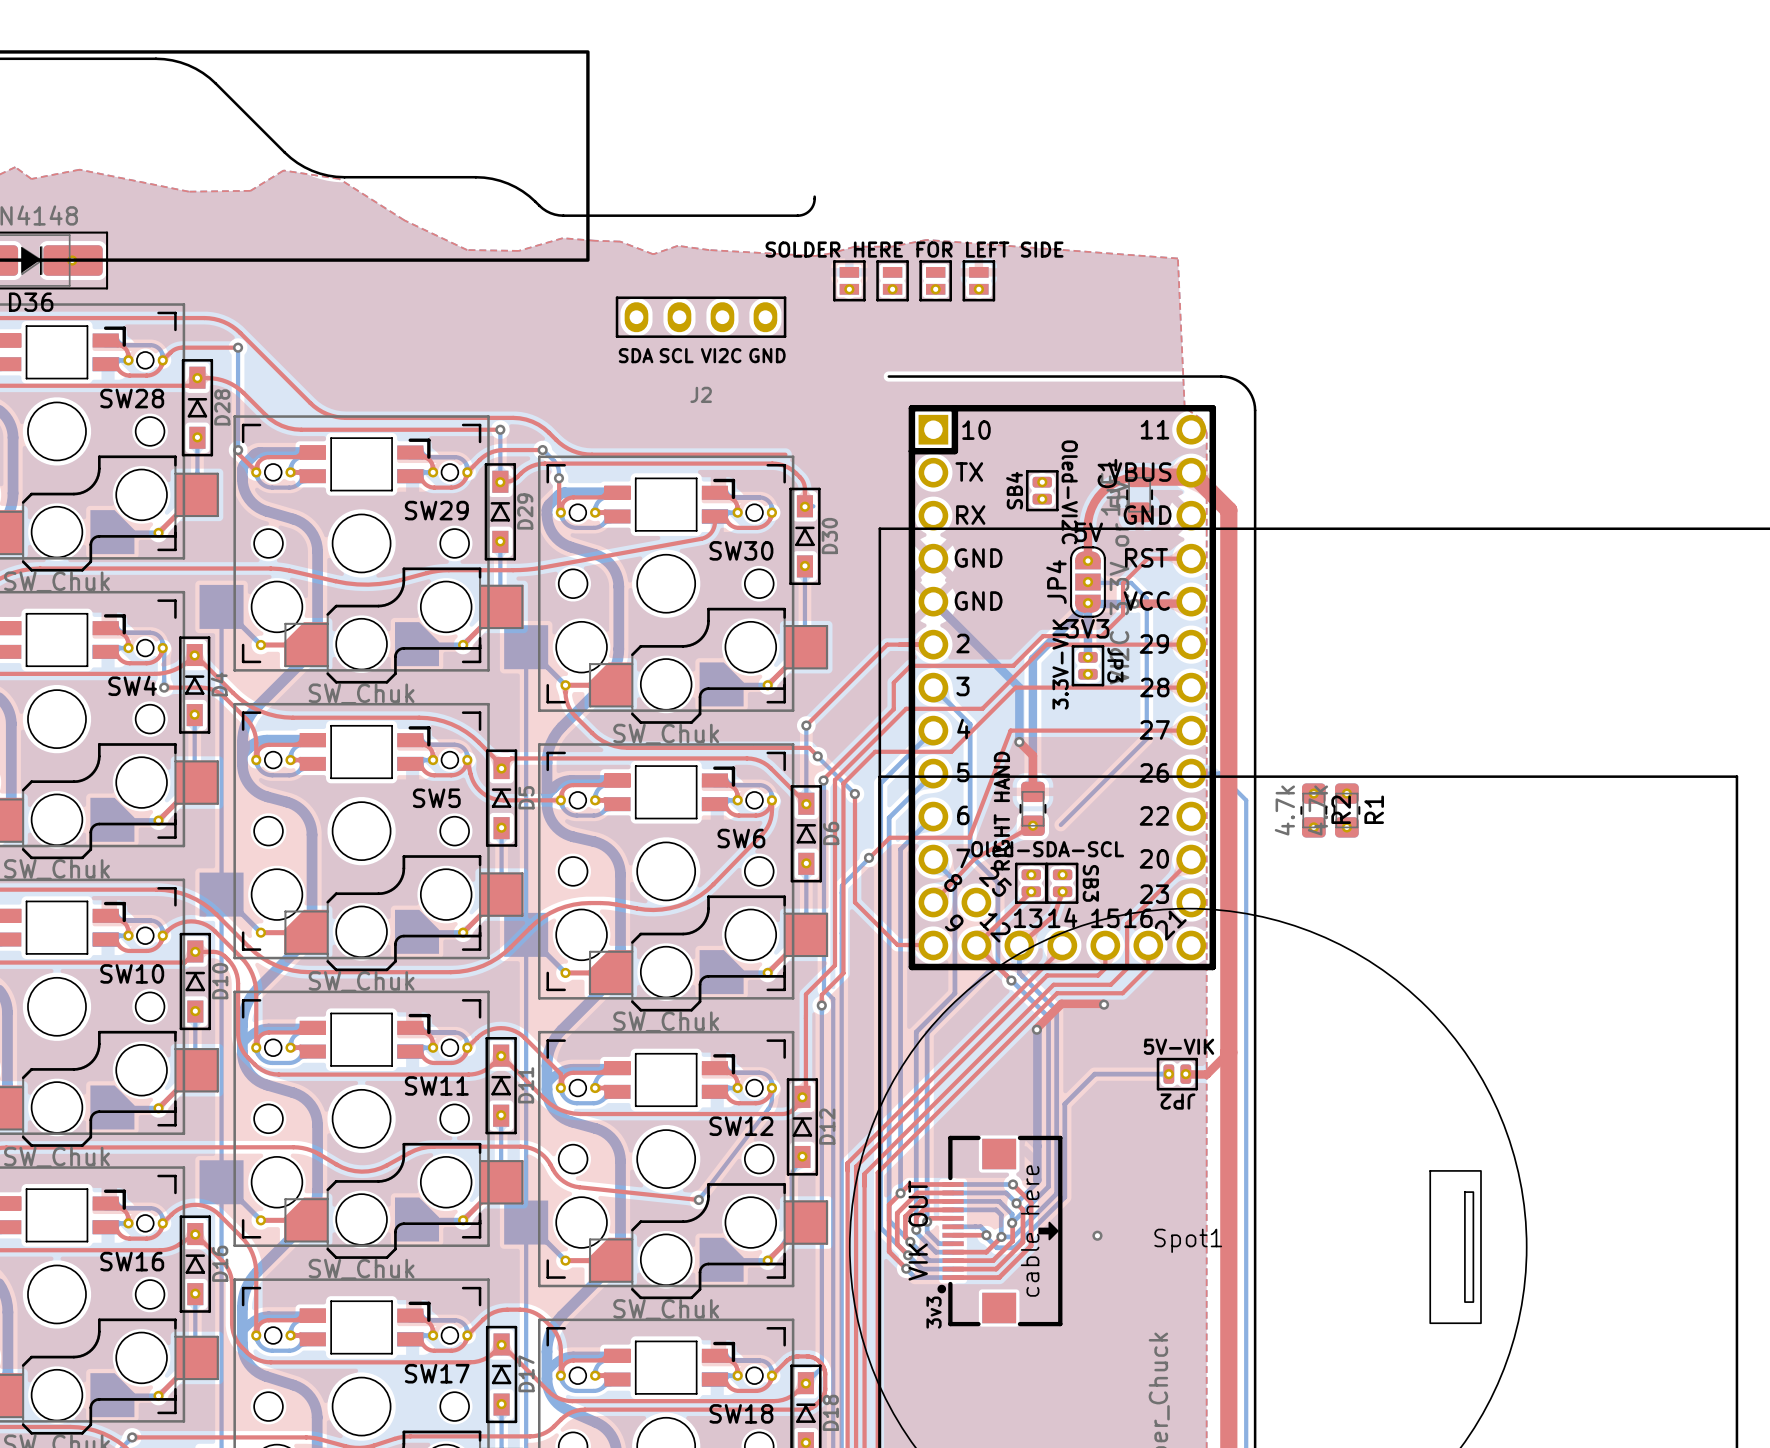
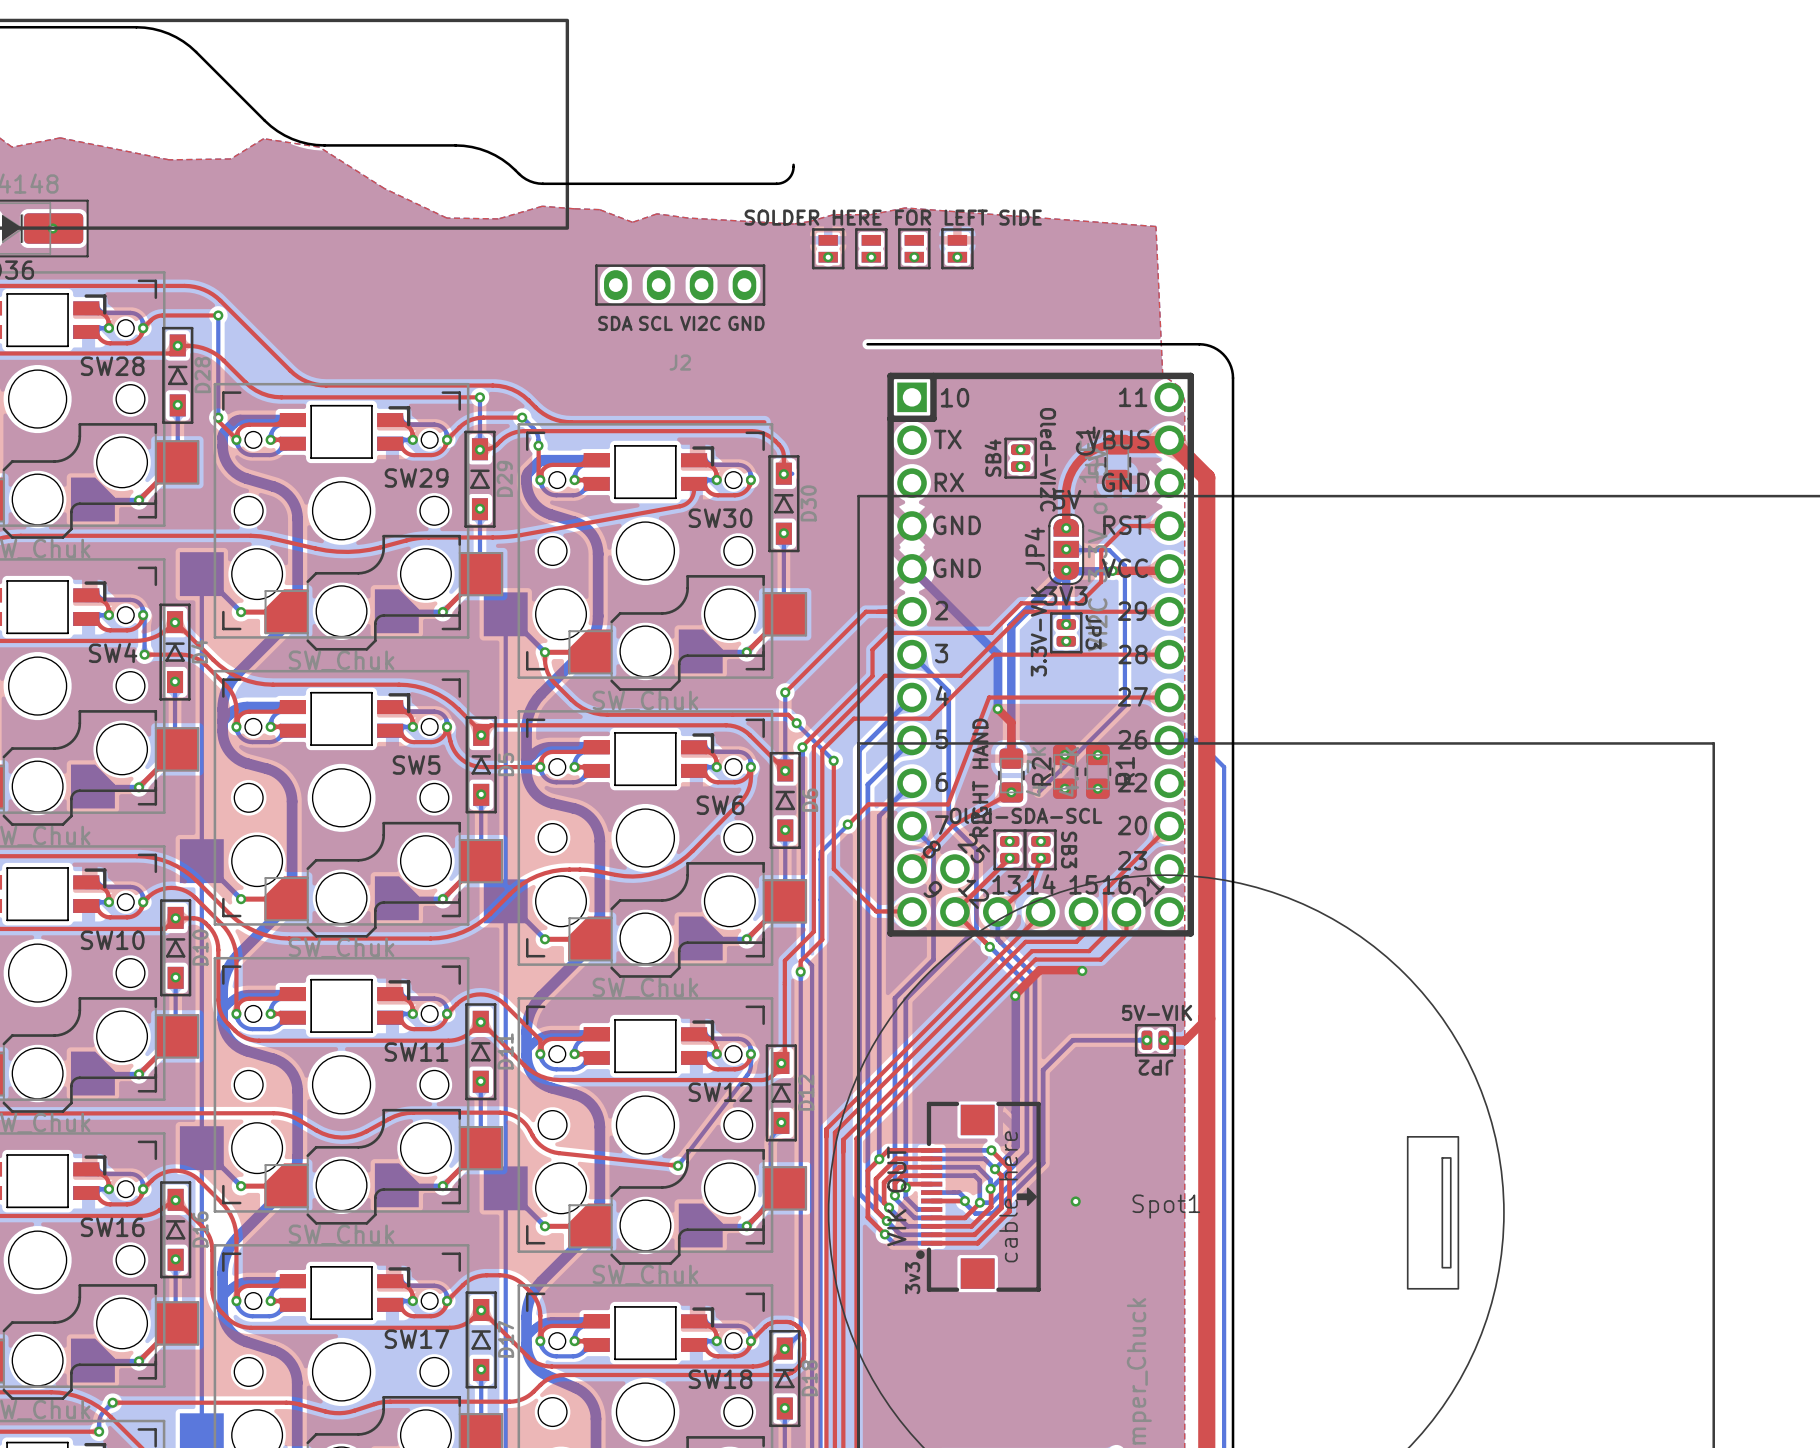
R2 name position: R2 (1341, 809) -> R2 (1041, 771)
R2 position: (1313, 810) -> (1064, 771)
R1 position: (1346, 810) -> (1097, 771)

